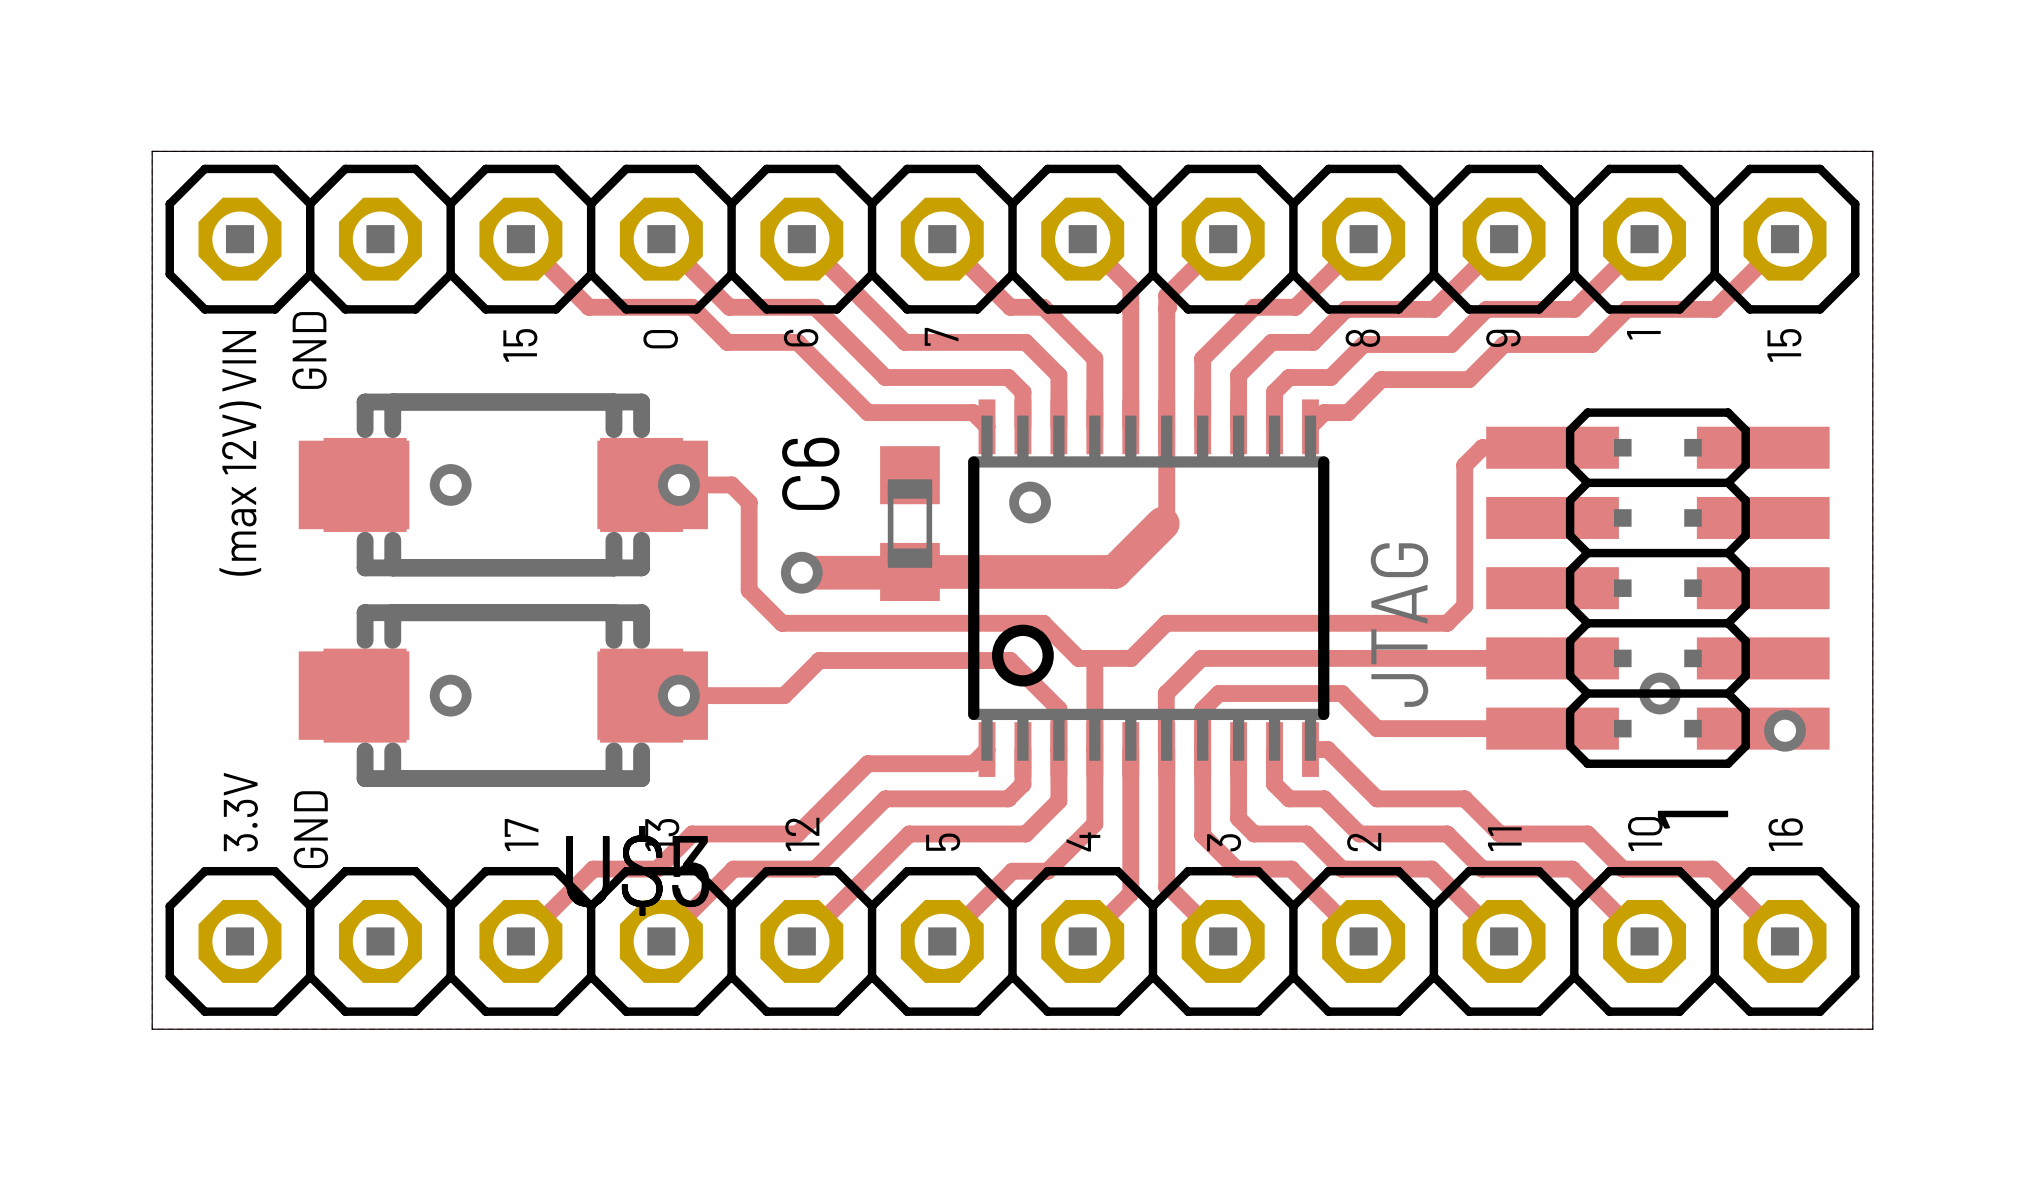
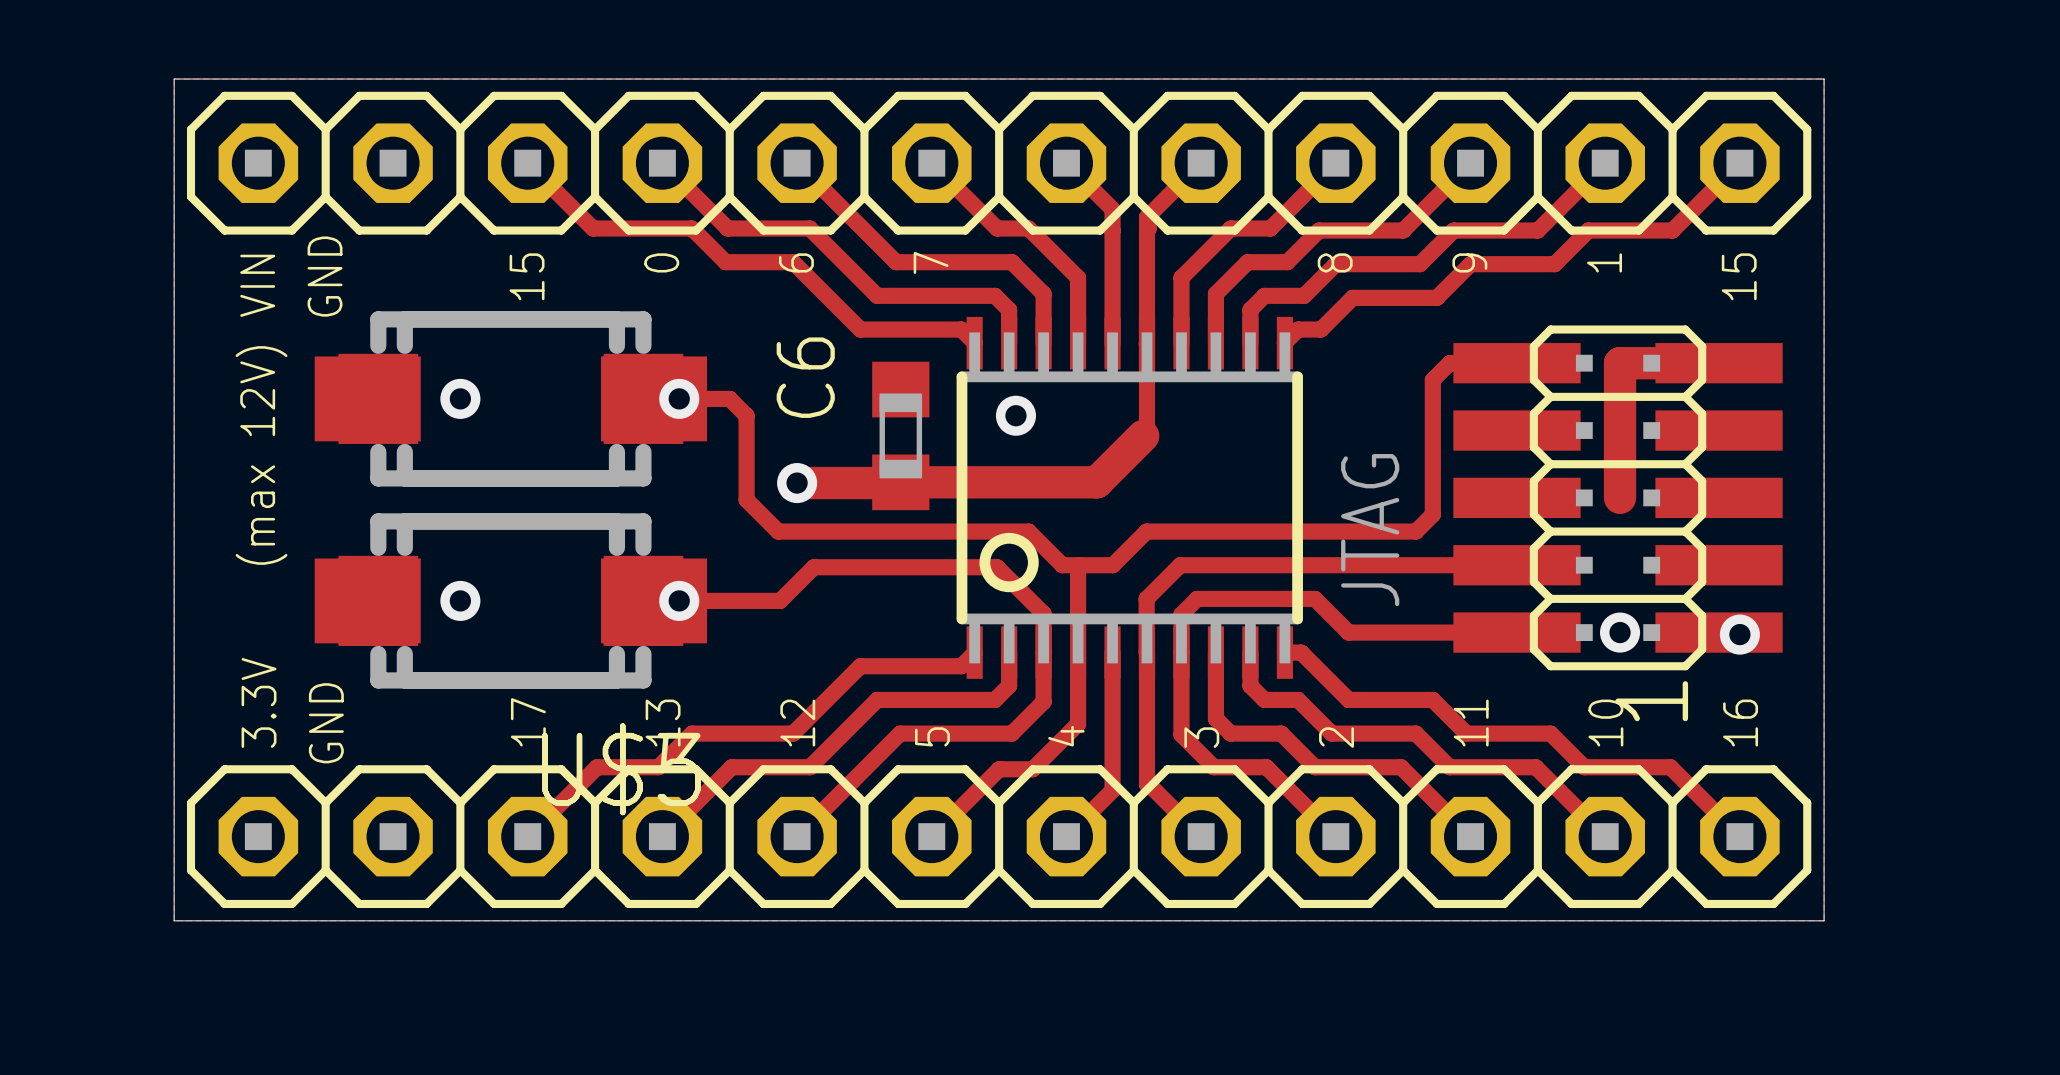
track: none -> (1719, 363) (1620, 363) (1620, 497)
via position: (1660, 693) -> (1620, 632)

